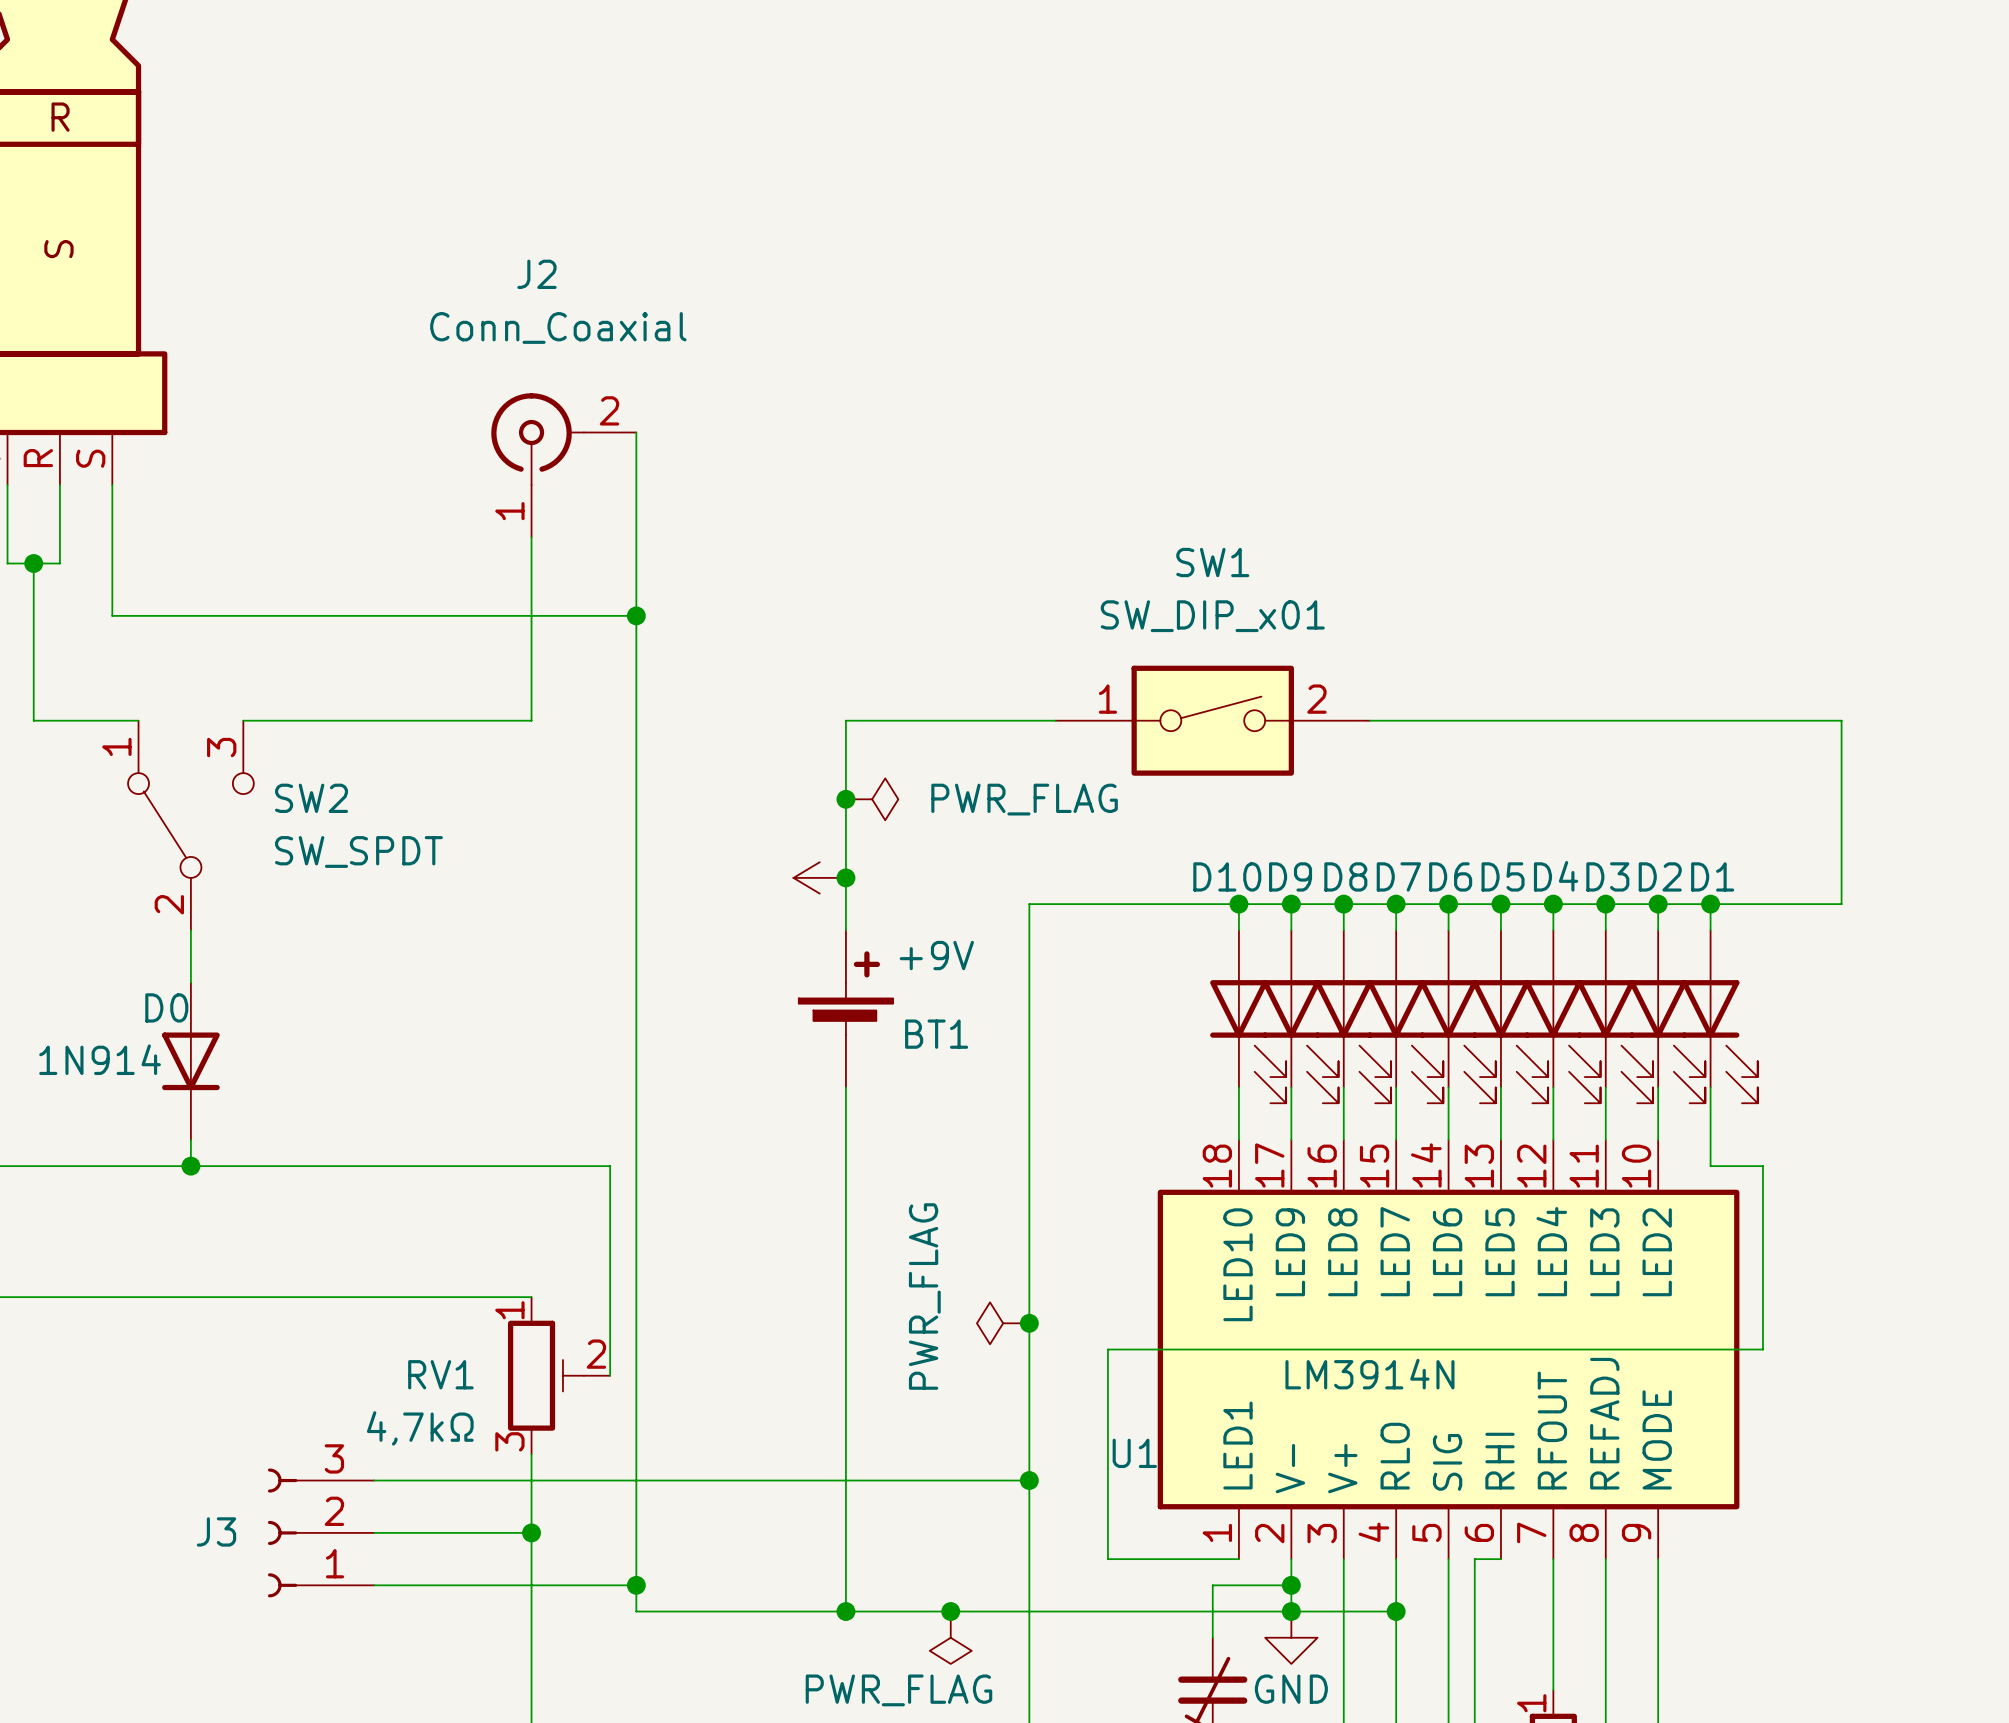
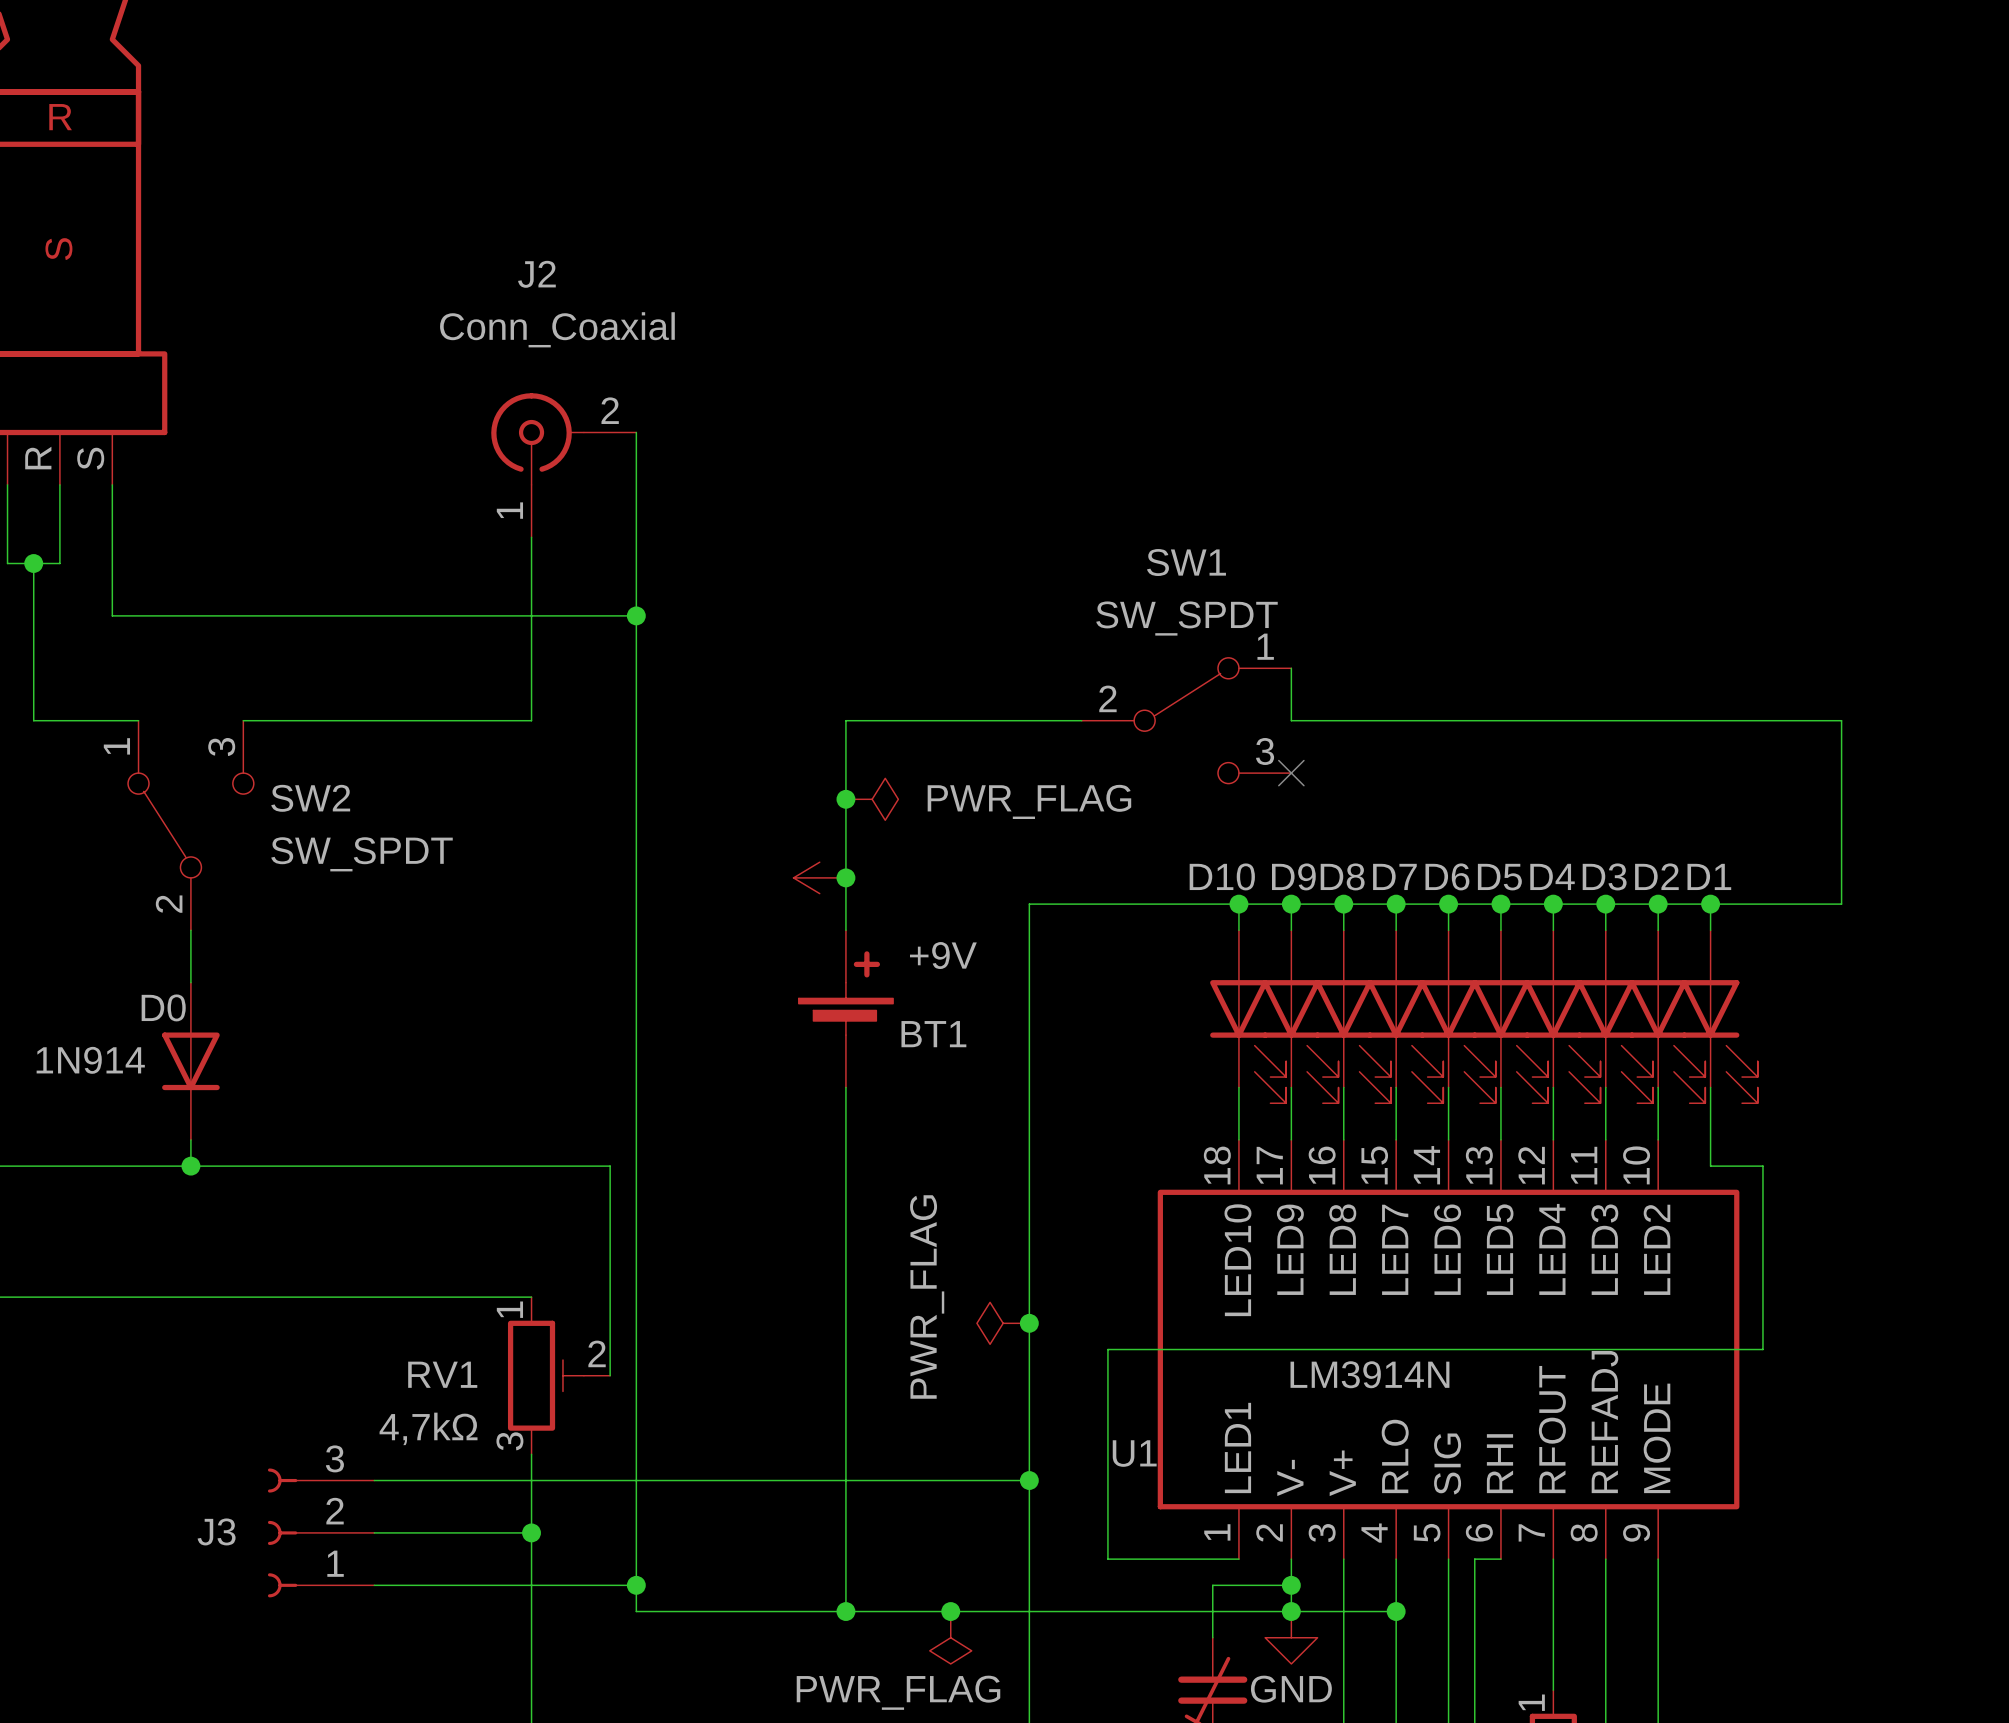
SW1 value: SW_DIP_x01 (1212, 616) -> SW_SPDT (1186, 618)
SW1 symbol: [1055, 665, 1370, 776] -> [1081, 657, 1292, 784]
no-connect mark: none -> (1291, 773)

